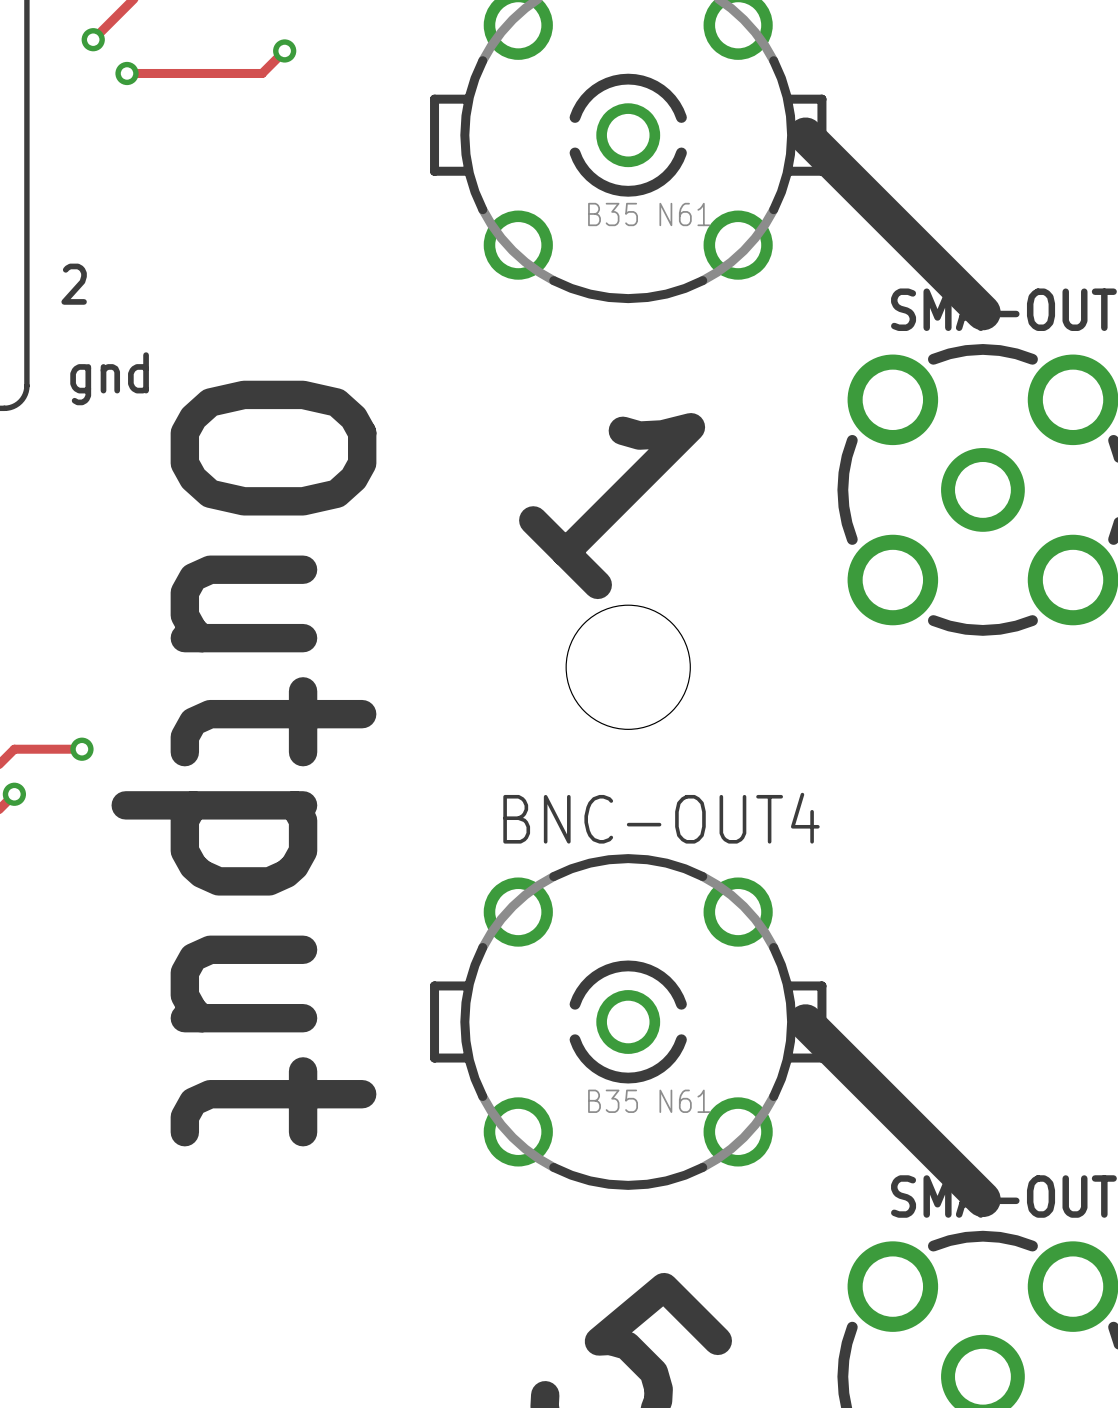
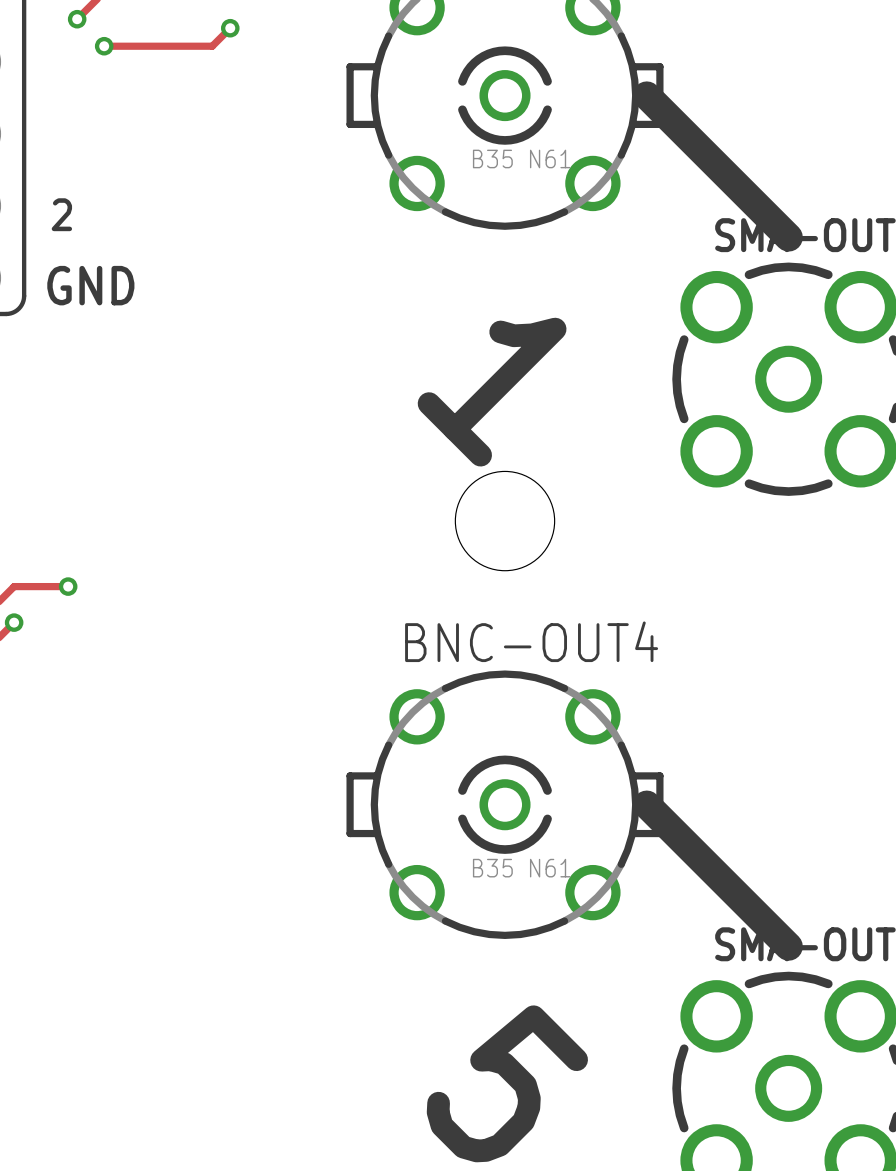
text: gnd (109, 378) -> GND (90, 285)
text: Output (243, 763) -> none

